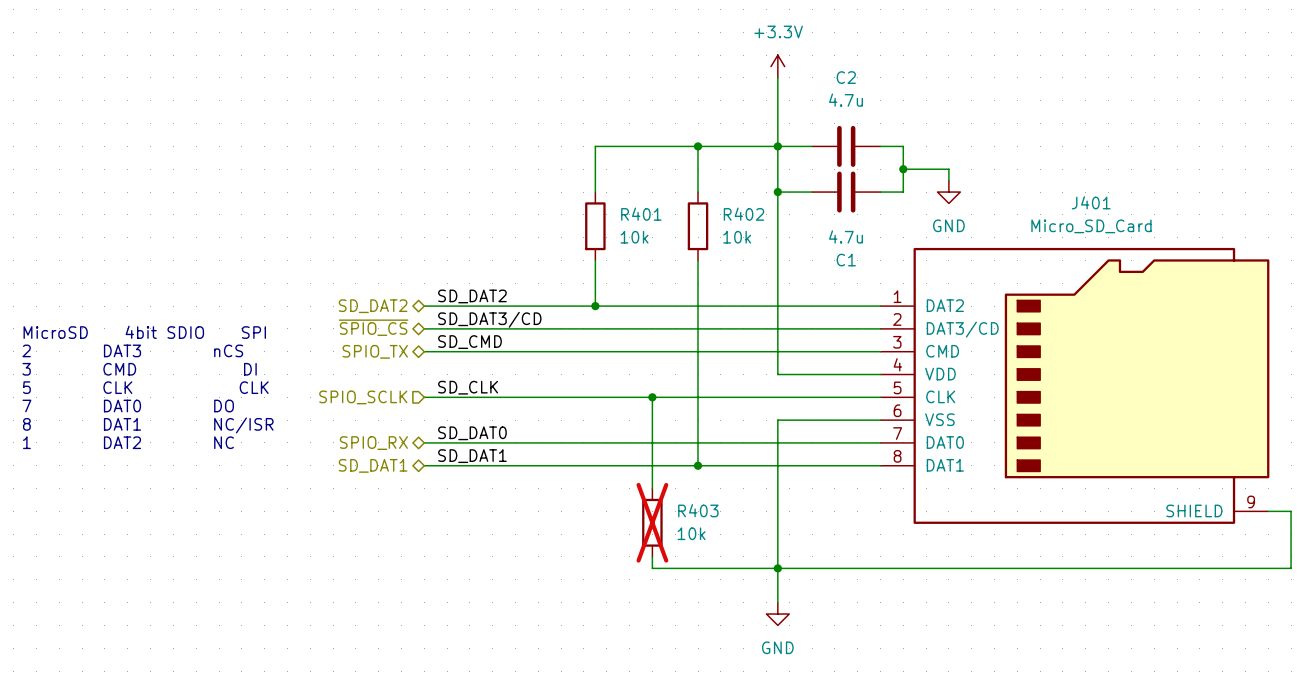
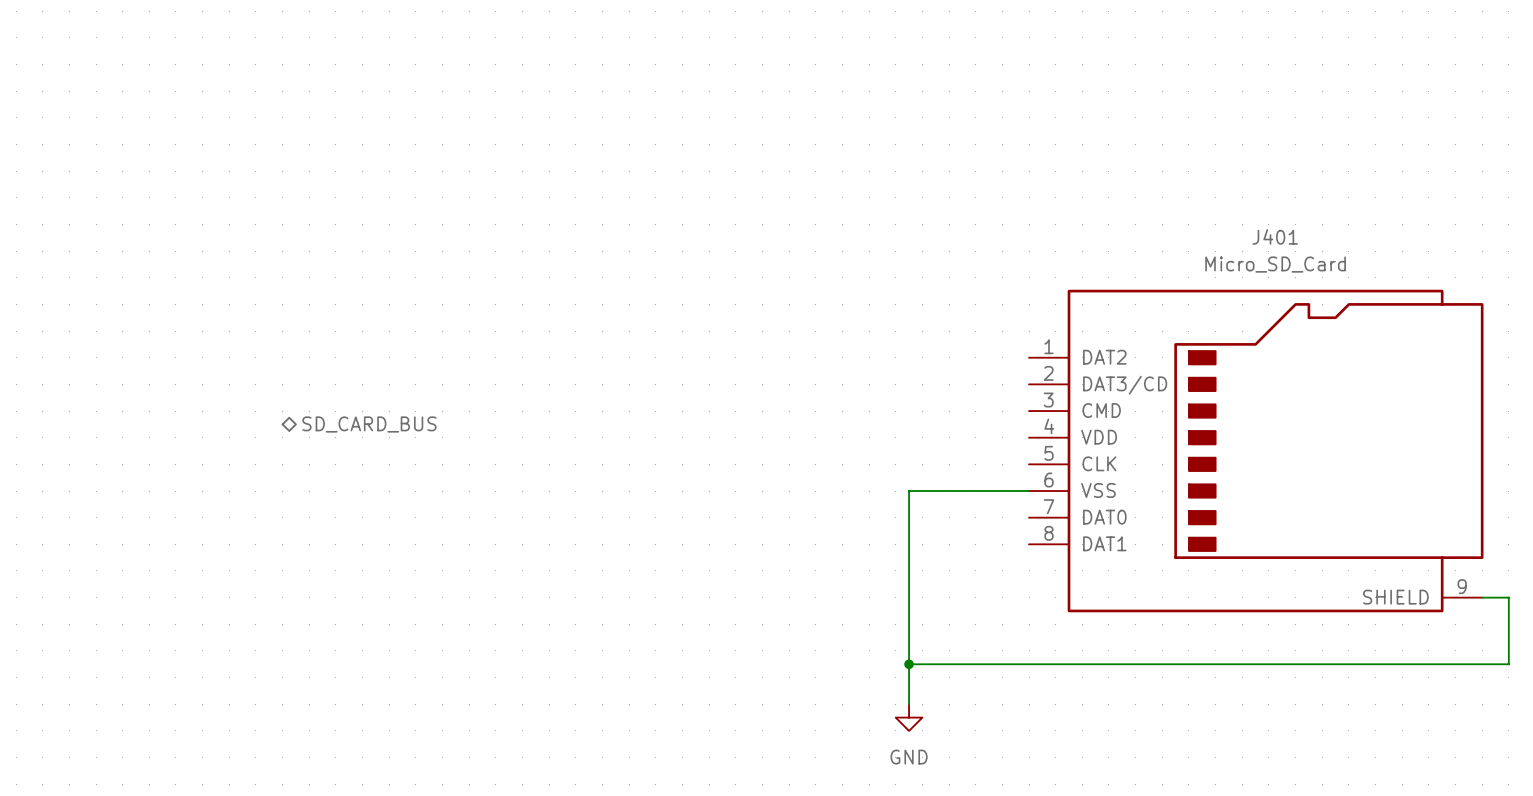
power symbol: +3.3V (777, 66) -> none
wire: (777, 77) (777, 374) (880, 374) -> none
wire: (698, 146) (698, 192) -> none
junction: (698, 146) -> none
junction: (777, 146) -> none
wire: (812, 146) (595, 146) (595, 192) -> none
C2: 4.7u (846, 146) -> none
wire: (880, 146) (903, 146) (903, 192) (880, 192) -> none
wire: (903, 169) (948, 169) (948, 180) -> none
junction: (903, 169) -> none
wire: (777, 192) (812, 192) -> none
junction: (777, 192) -> none
C1: 4.7u (846, 192) -> none
power symbol: GND (948, 192) -> none
R401: 10k (595, 226) -> none
R402: 10k (698, 226) -> none
wire: (595, 260) (595, 306) -> none
wire: (698, 260) (698, 465) -> none
label: SD_DAT2 (472, 296) -> none
hierarchical label: SD_DAT2 (373, 306) -> none
wire: (424, 306) (880, 306) -> none
junction: (595, 306) -> none
label: SD_DAT3/CD (489, 319) -> none
hierarchical label: ~{SPIO_CS} (373, 327) -> none
wire: (424, 328) (880, 328) -> none
text: MicroSD 4bit SDIO SPI (144, 332) -> none
label: SD_CMD (470, 342) -> none
text: 2 DAT3 nCS (132, 350) -> none
hierarchical label: SPIO_TX (375, 351) -> none
wire: (424, 351) (880, 351) -> none
hierarchical label: none -> SD_CARD_BUS (369, 424)
text: 3 CMD DI (139, 369) -> none
text: 5 CLK CLK (145, 387) -> none
label: SD_CLK (468, 387) -> none
hierarchical label: SPIO_SCLK (363, 397) -> none
wire: (424, 397) (880, 397) -> none
wire: (652, 397) (652, 488) -> none
junction: (652, 397) -> none
text: 7 DAT0 DO (128, 406) -> none
text: 8 DAT1 NC/ISR (148, 425) -> none
label: SD_DAT0 (472, 433) -> none
text: 1 DAT2 NC (128, 442) -> none
wire: (424, 442) (880, 442) -> none
hierarchical label: SPIO_RX (373, 443) -> none
label: SD_DAT1 (472, 456) -> none
hierarchical label: SD_DAT1 (373, 465) -> none
wire: (424, 465) (880, 465) -> none
junction: (698, 465) -> none
R403: 10k (652, 522) -> none
wire: (652, 556) (652, 568) (777, 568) -> none

